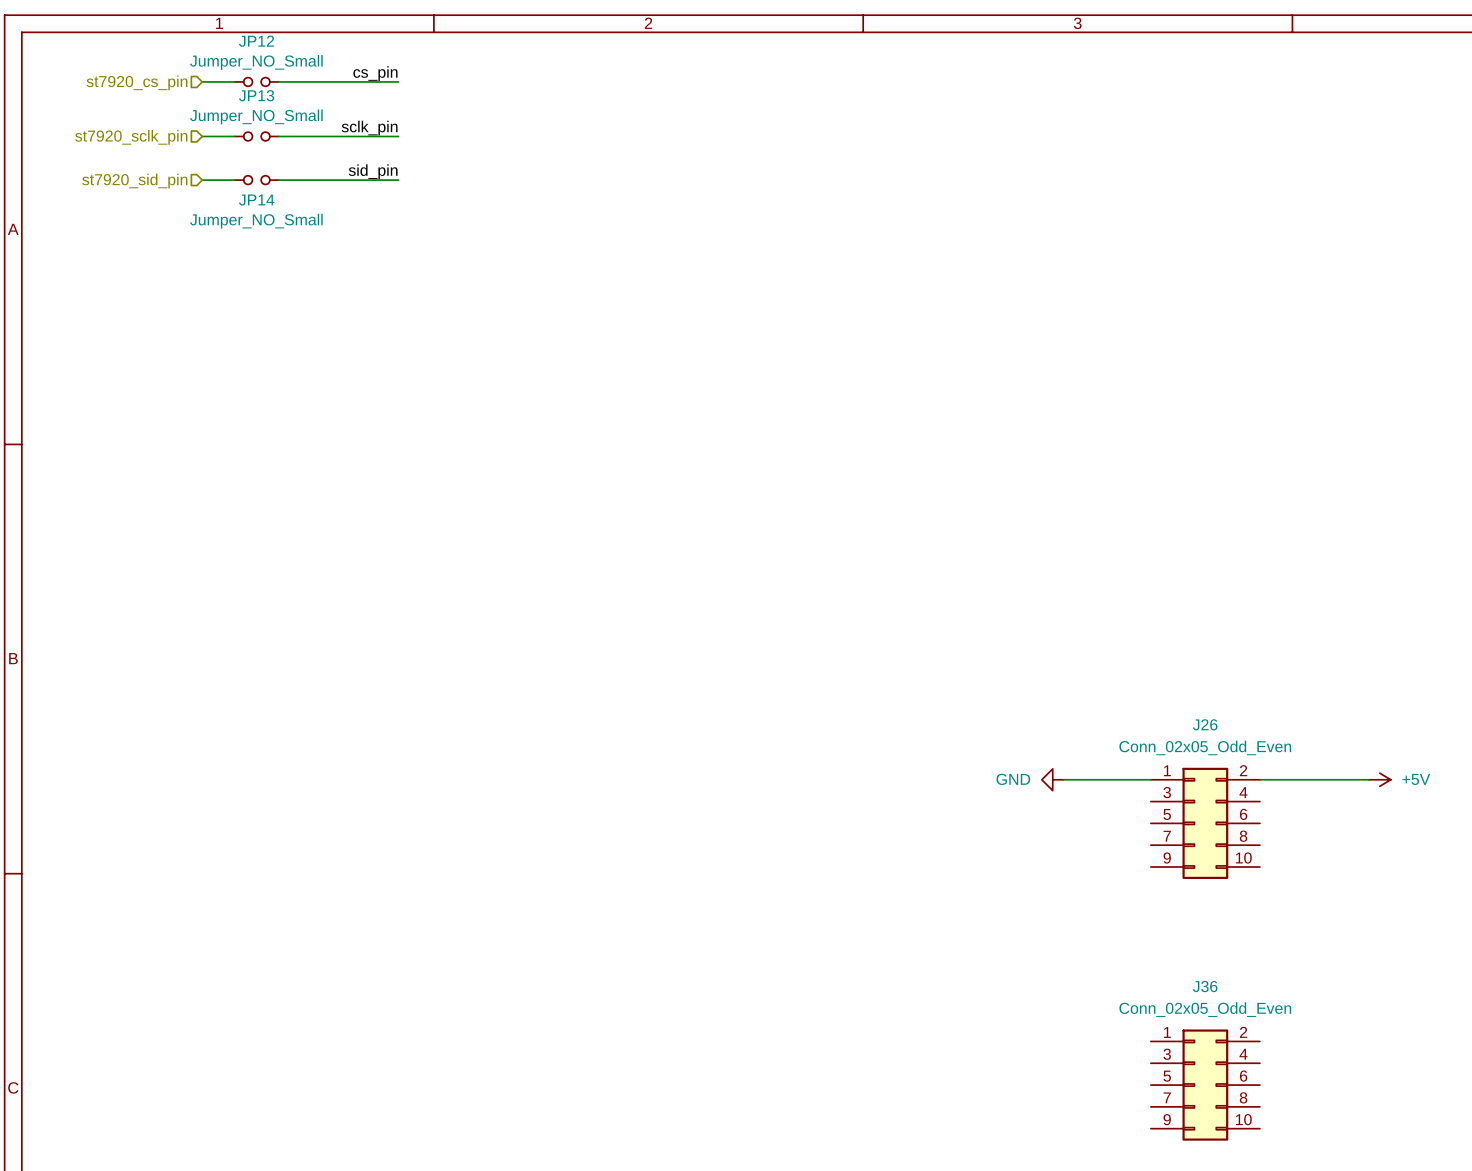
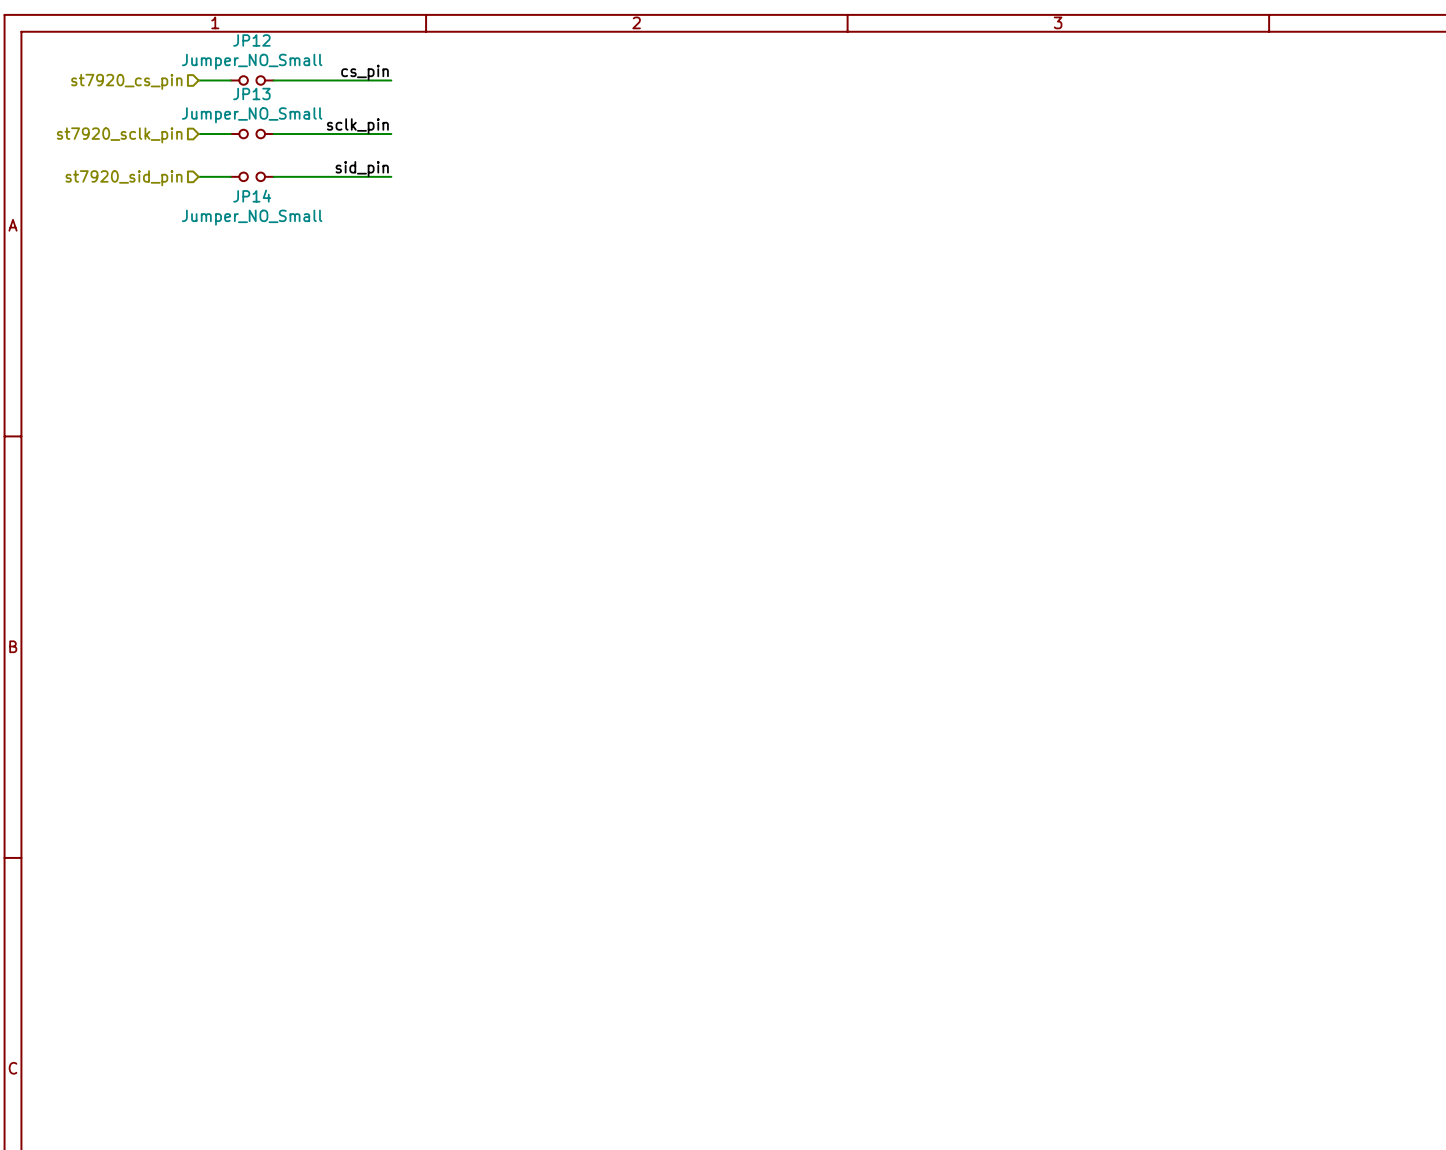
power symbol: GND (1052, 779) -> none
wire: (1063, 779) (1150, 779) -> none
wire: (1259, 779) (1368, 779) -> none
power symbol: +5V (1379, 779) -> none
J26: Conn_02x05_Odd_Even (1205, 823) -> none
J36: Conn_02x05_Odd_Even (1205, 1085) -> none

